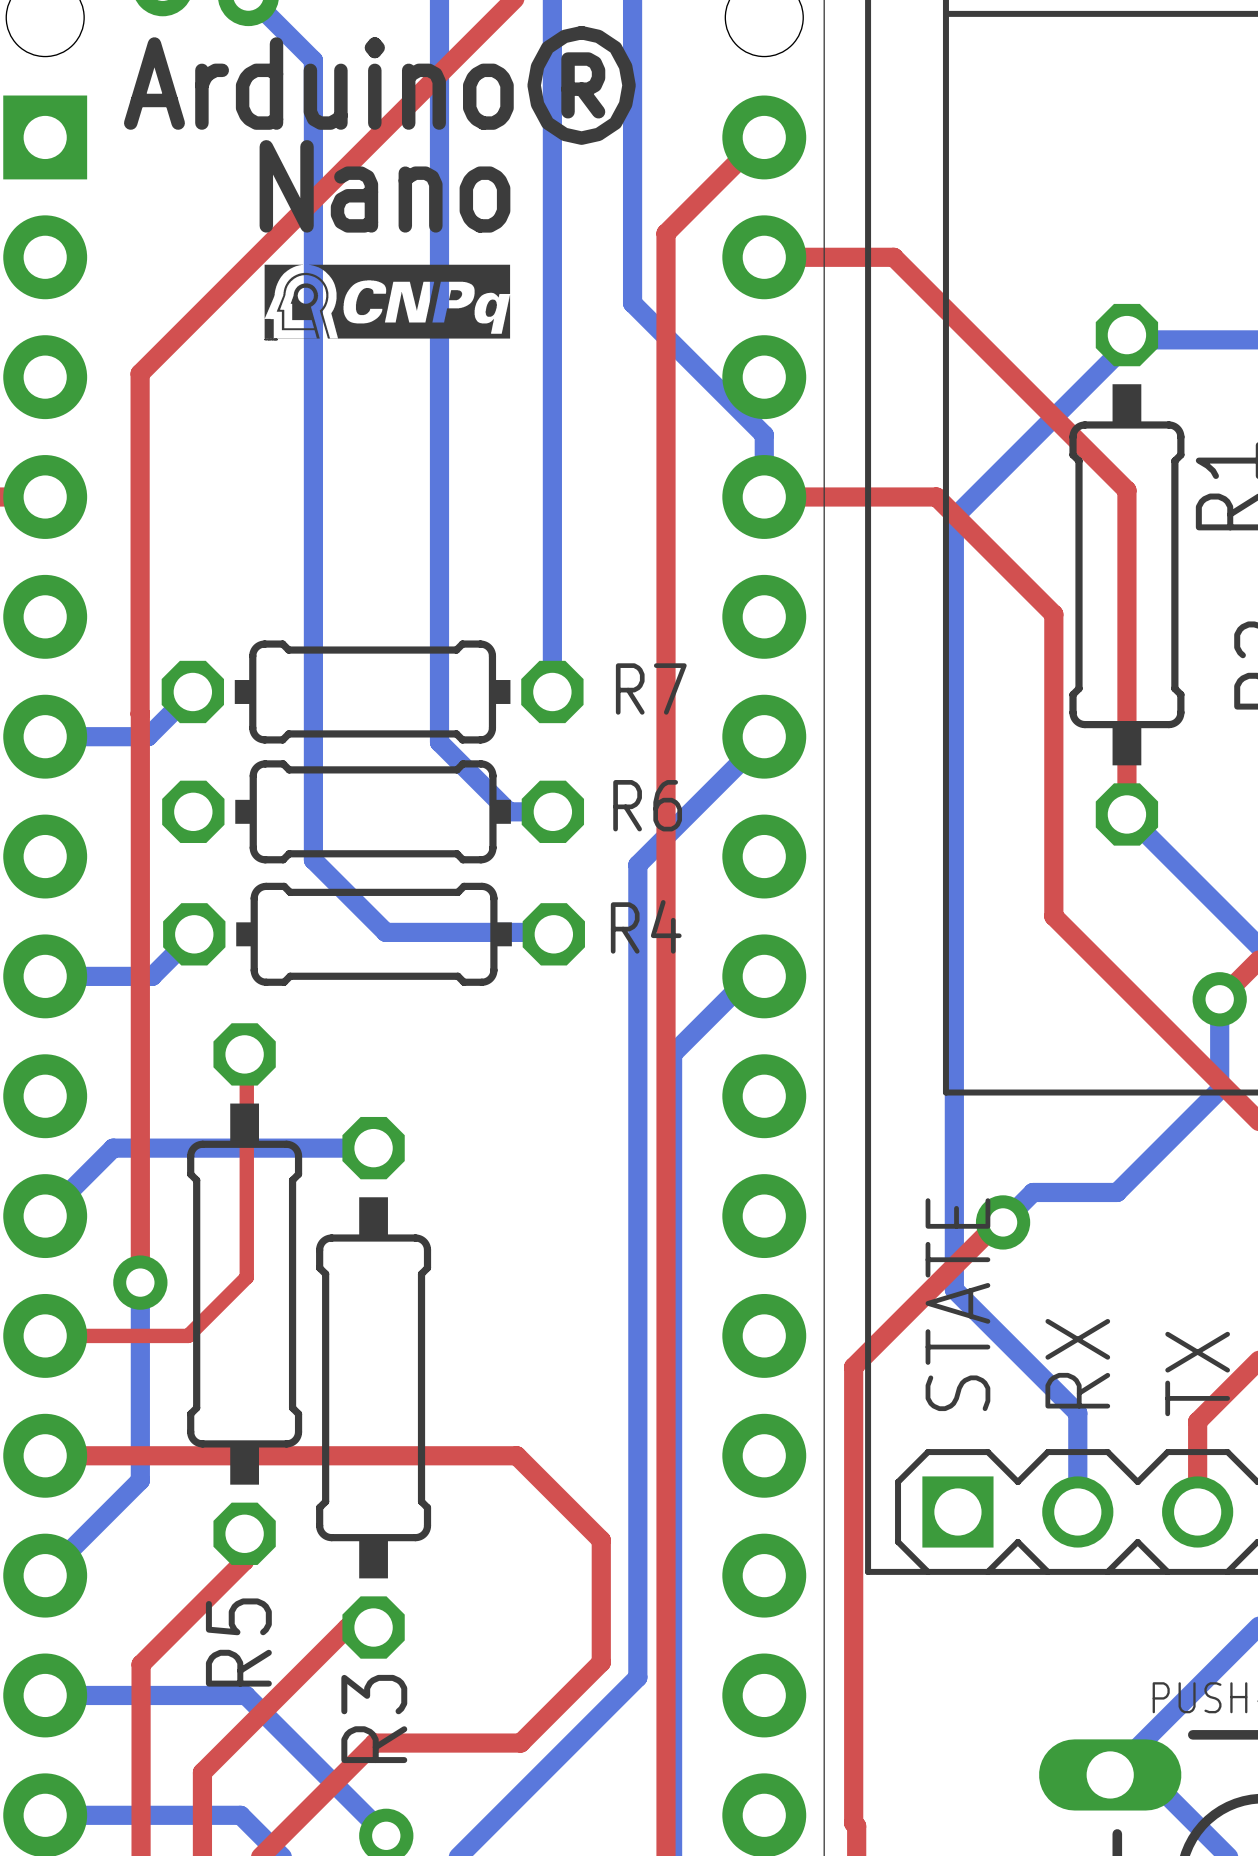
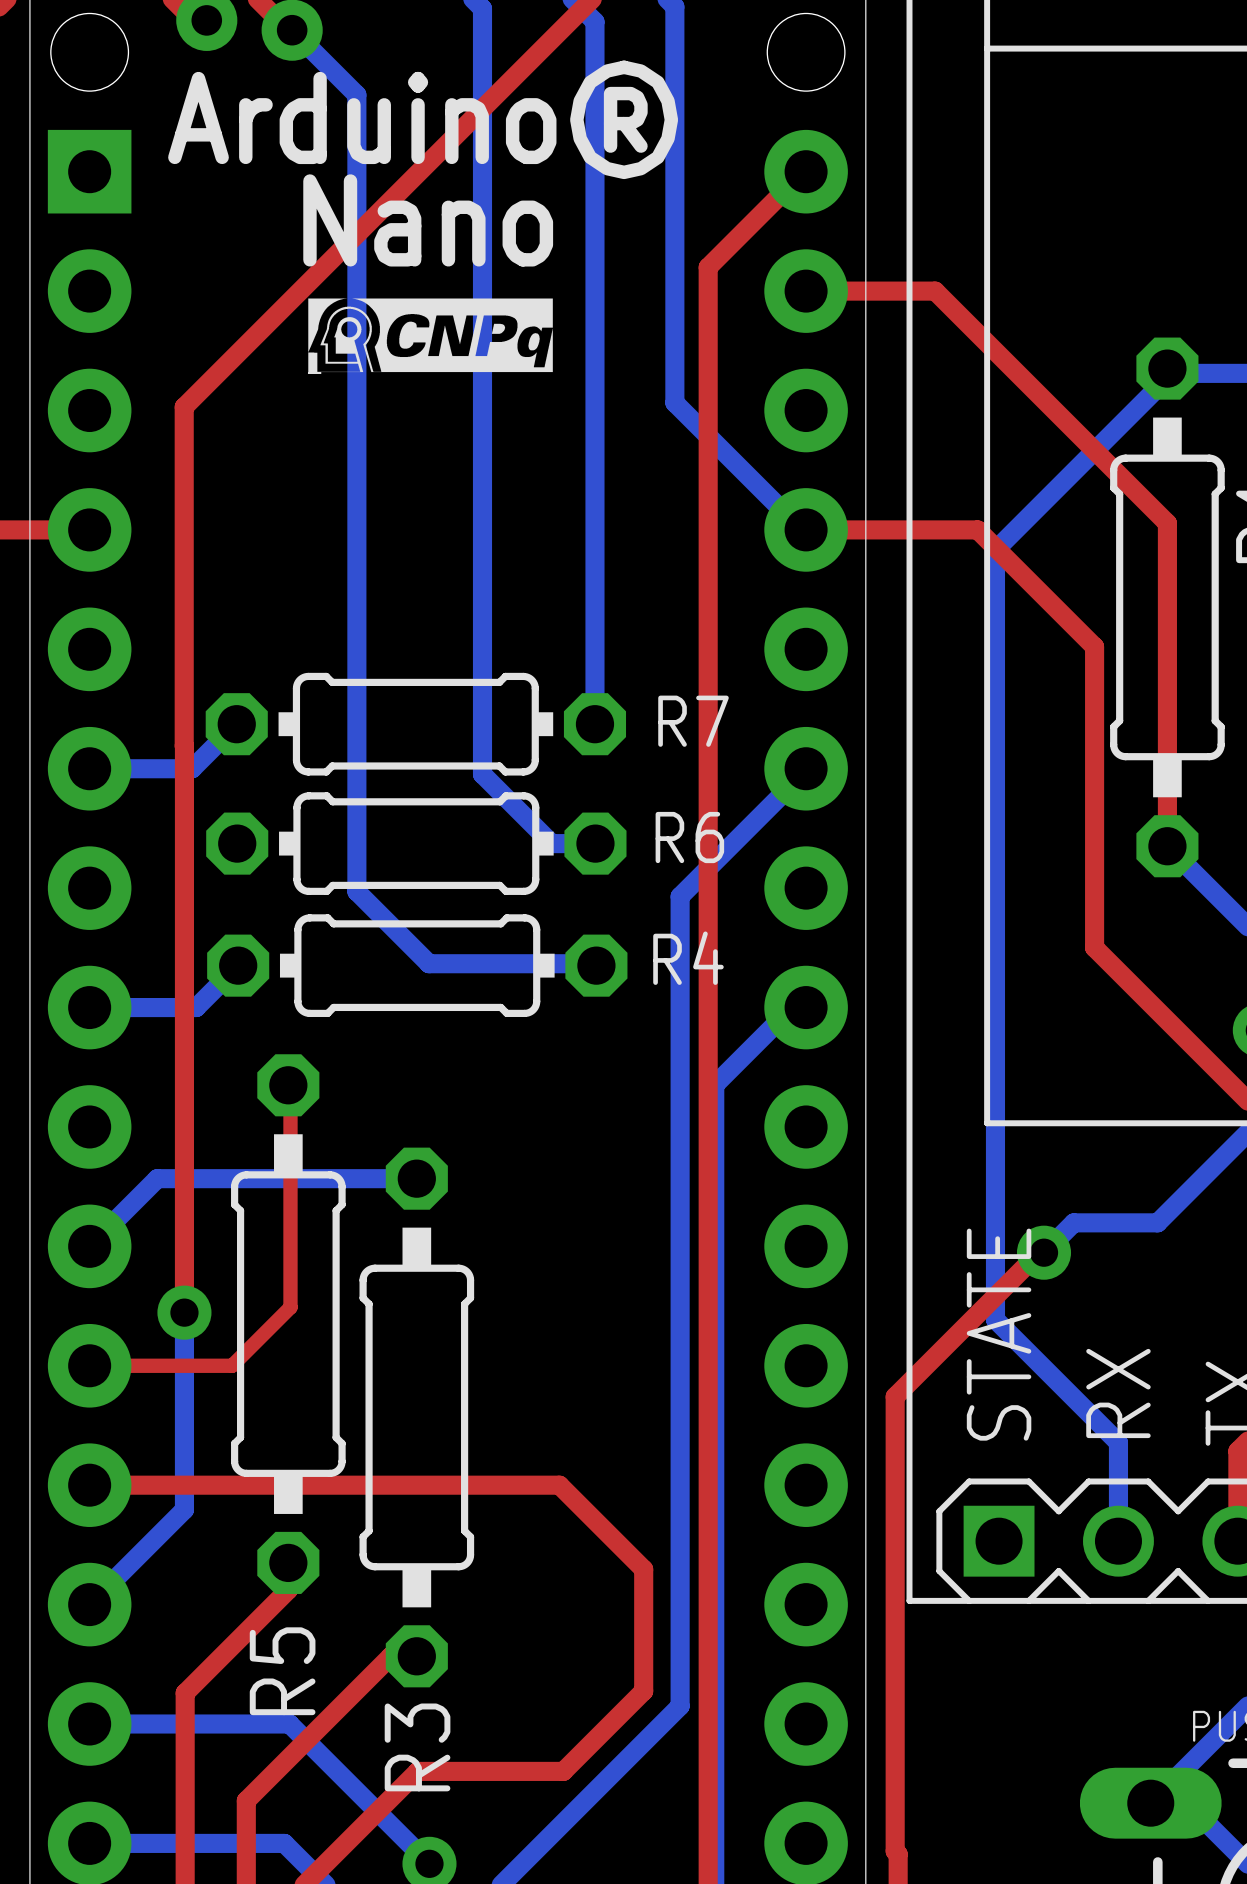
bottom track: (632, 303) (764, 434) (764, 497) -> (674, 336) (674, 402) (801, 529) (806, 529)

